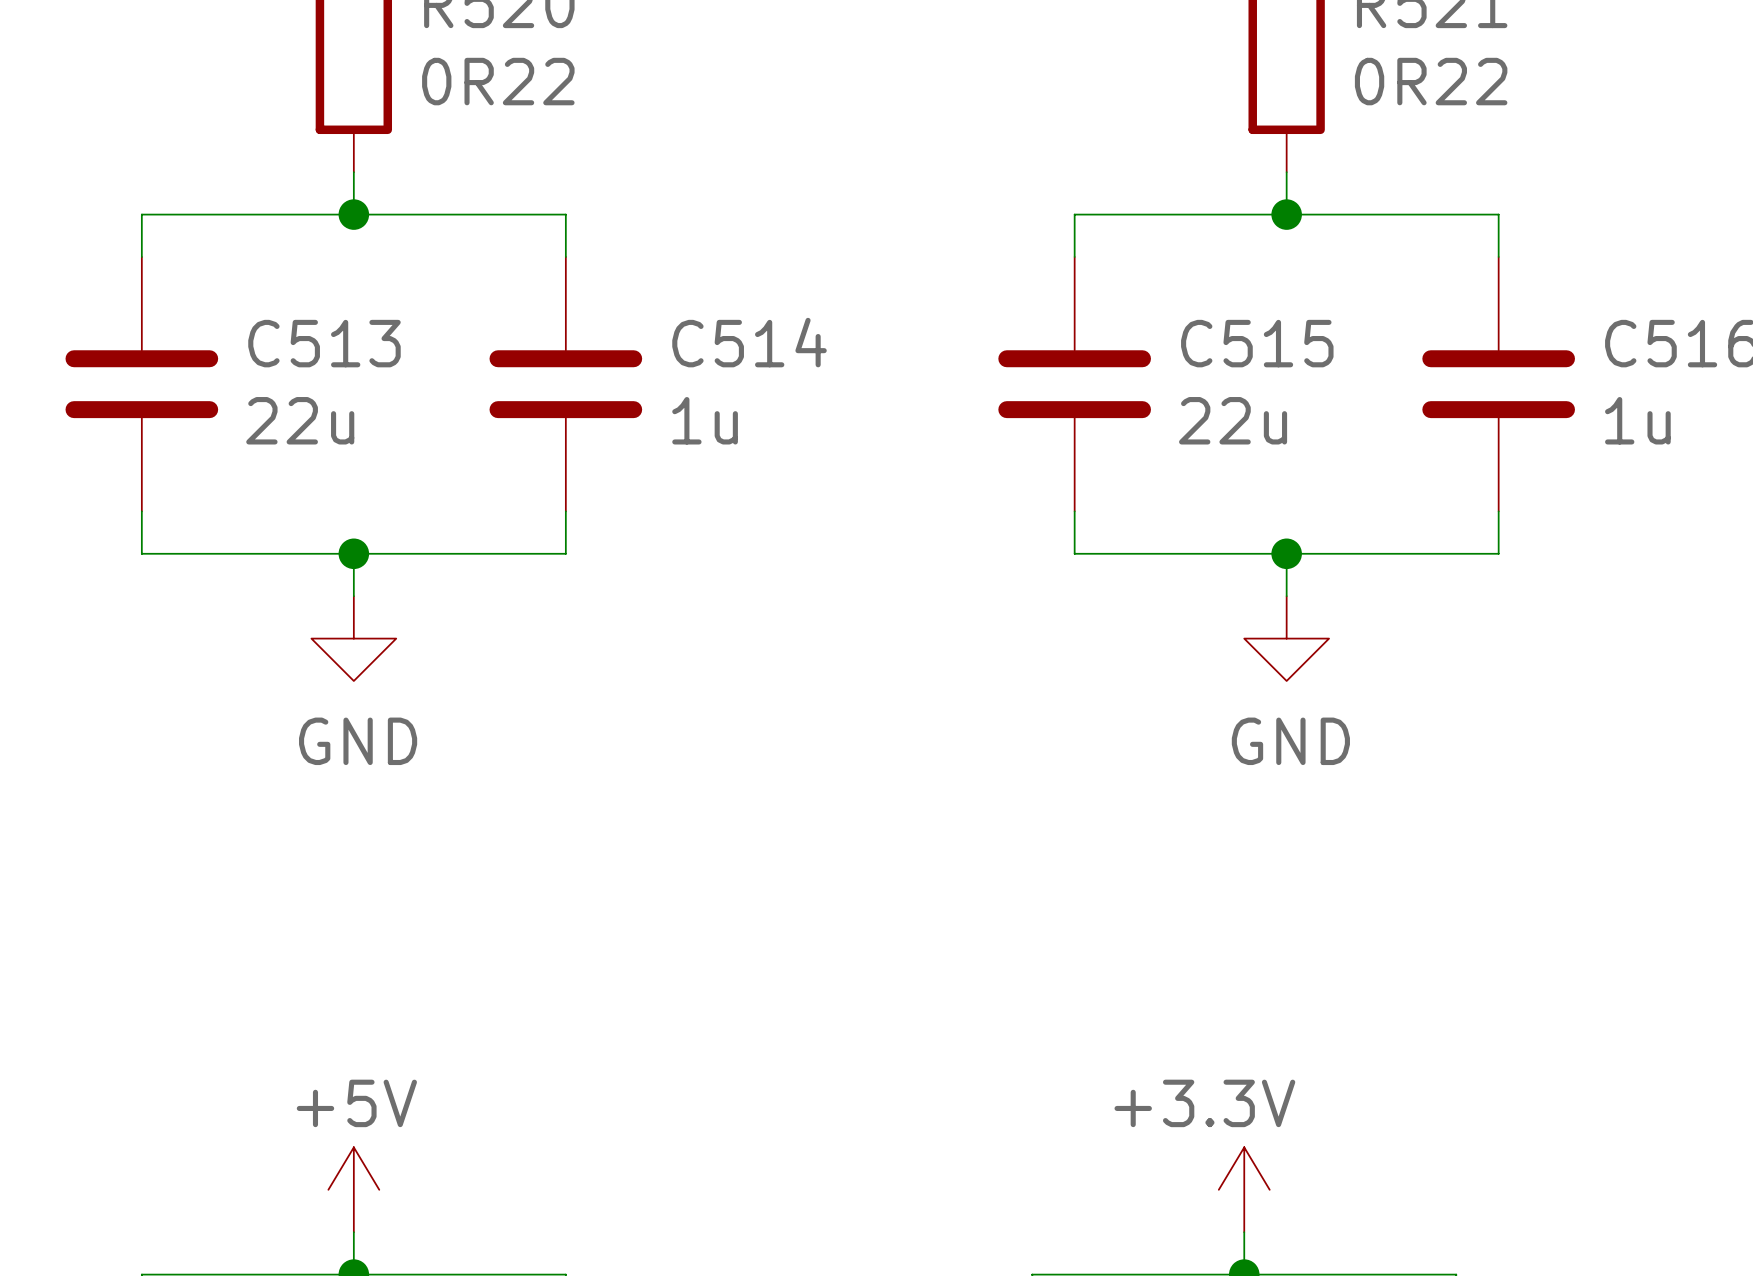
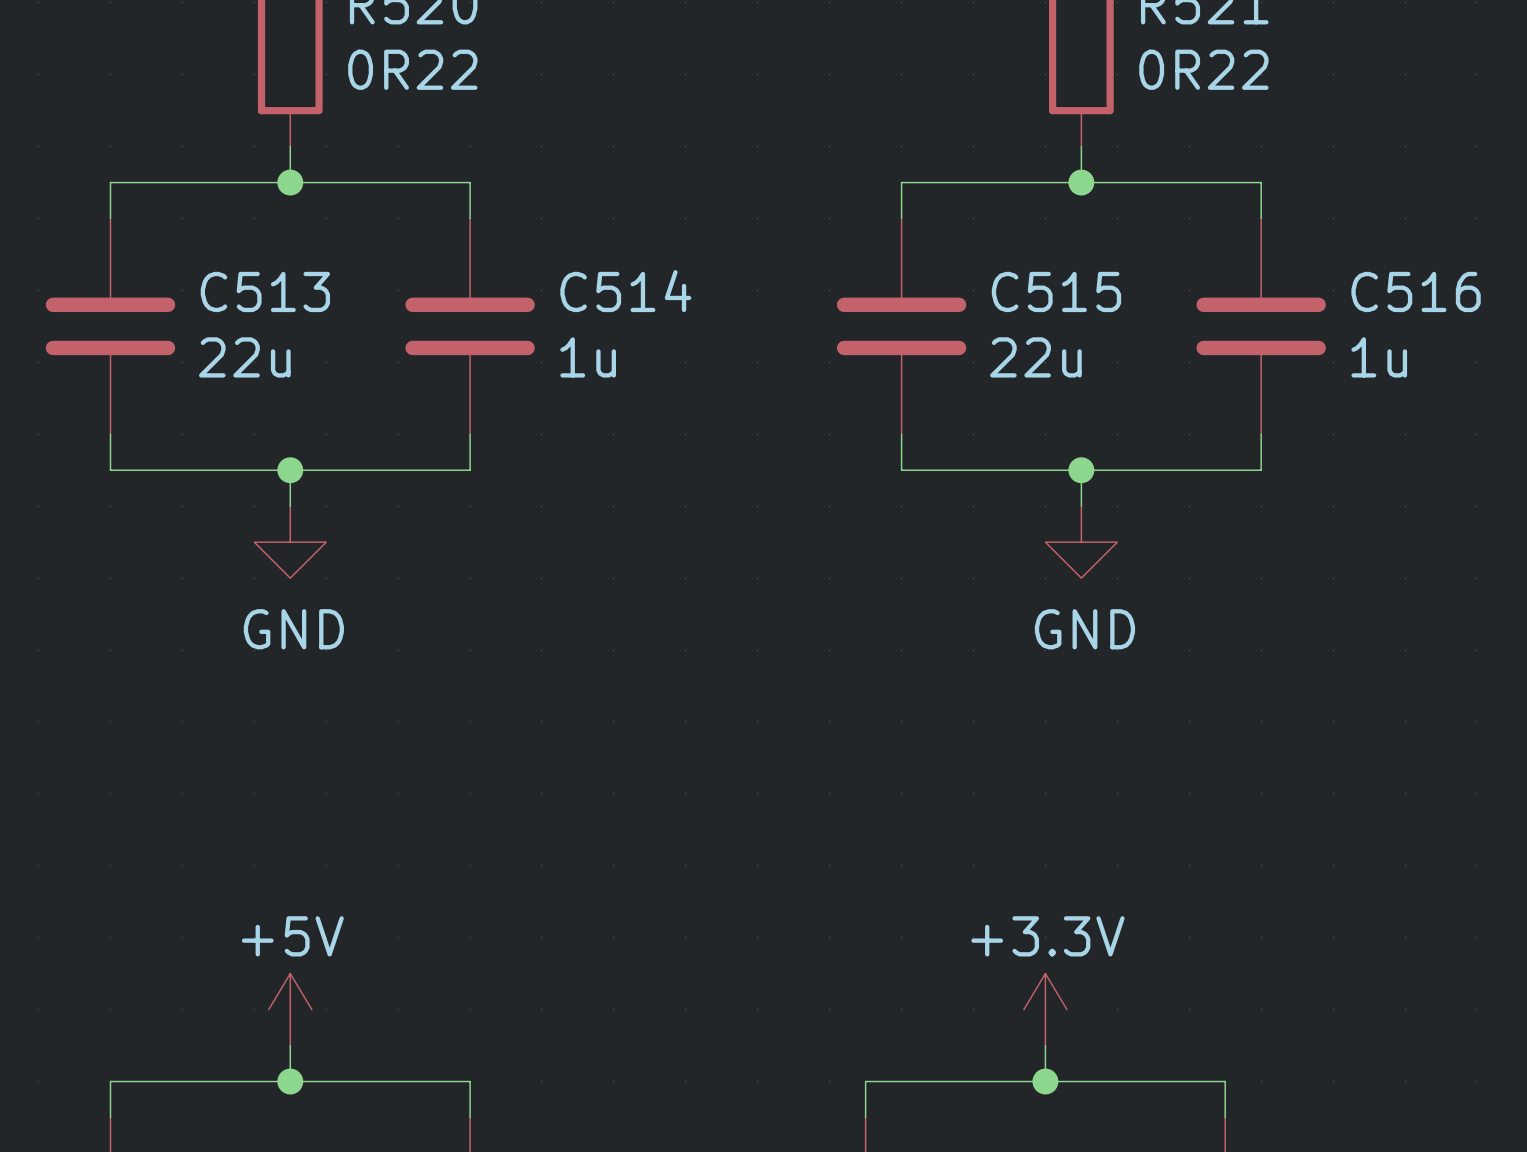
power symbol text position: +3.3V (1204, 1103) -> +3.3V (1047, 936)

